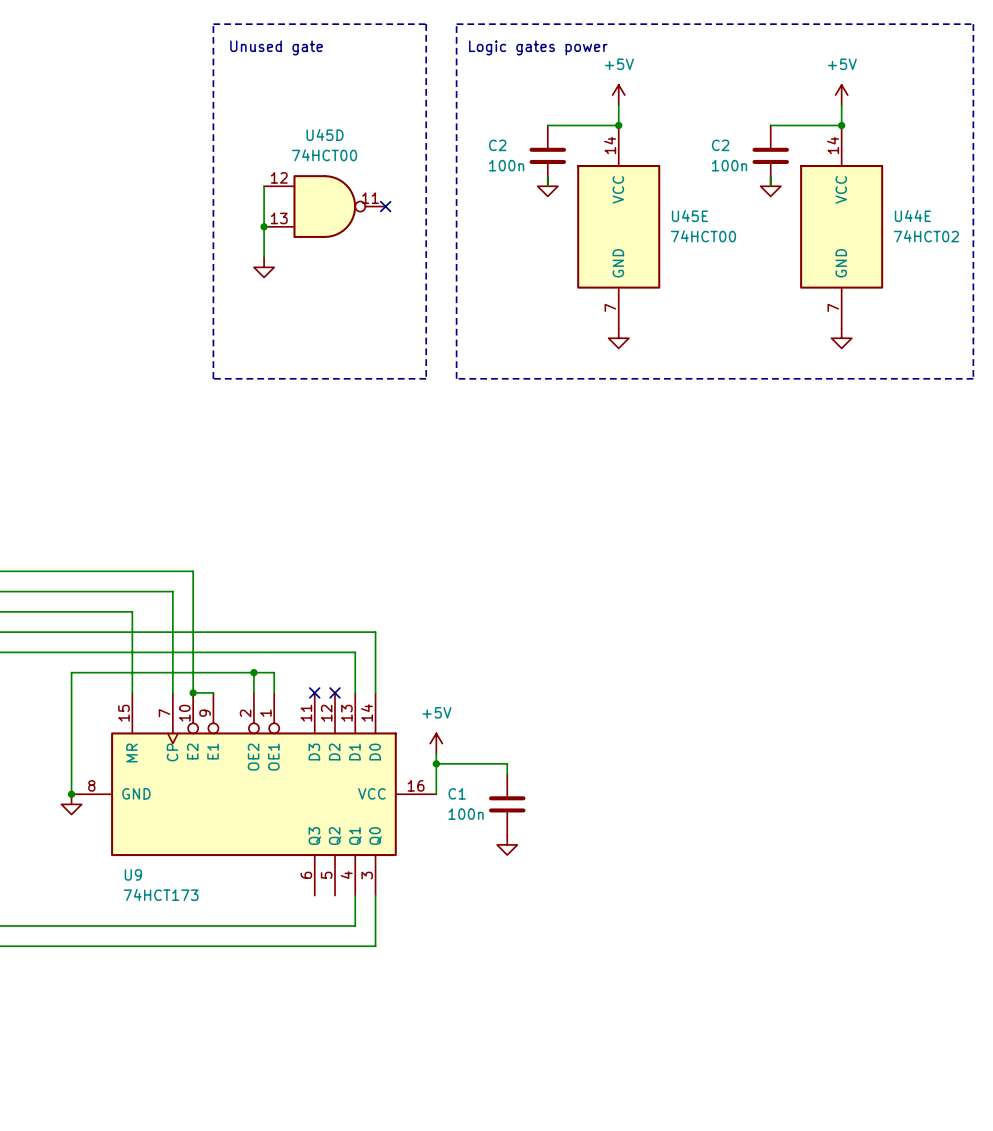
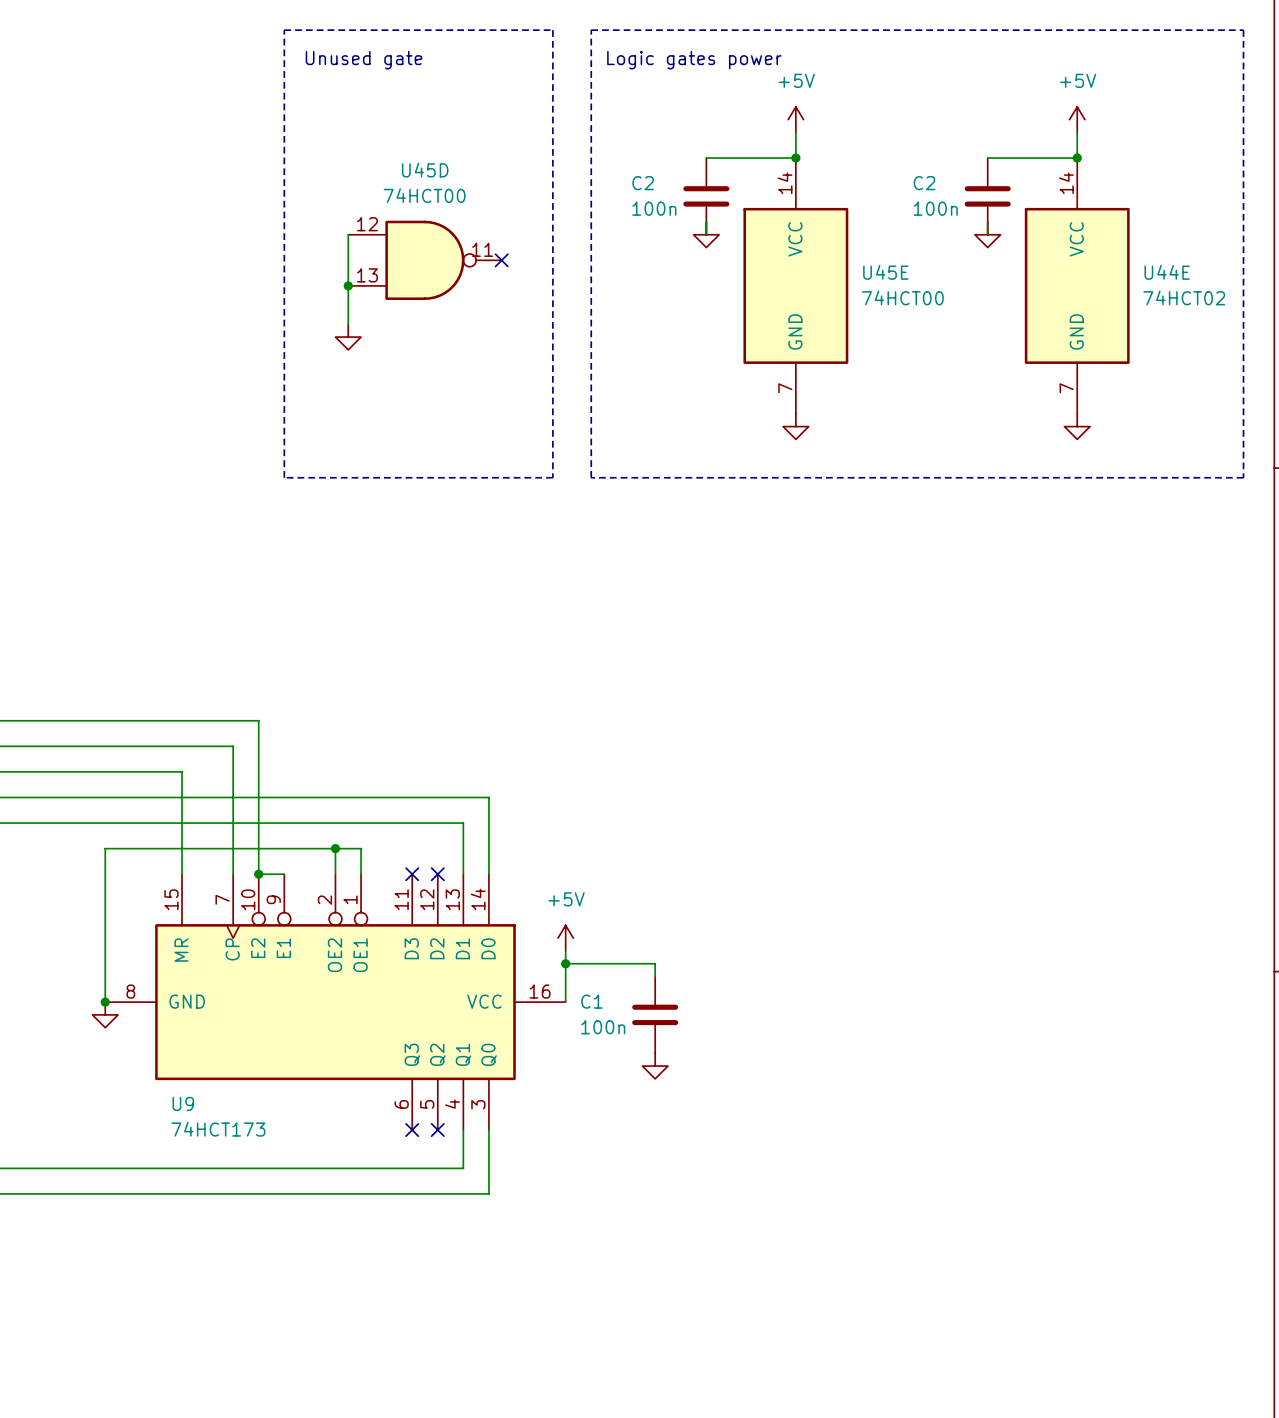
no-connect mark: none -> (412, 1130)
no-connect mark: none -> (437, 1130)

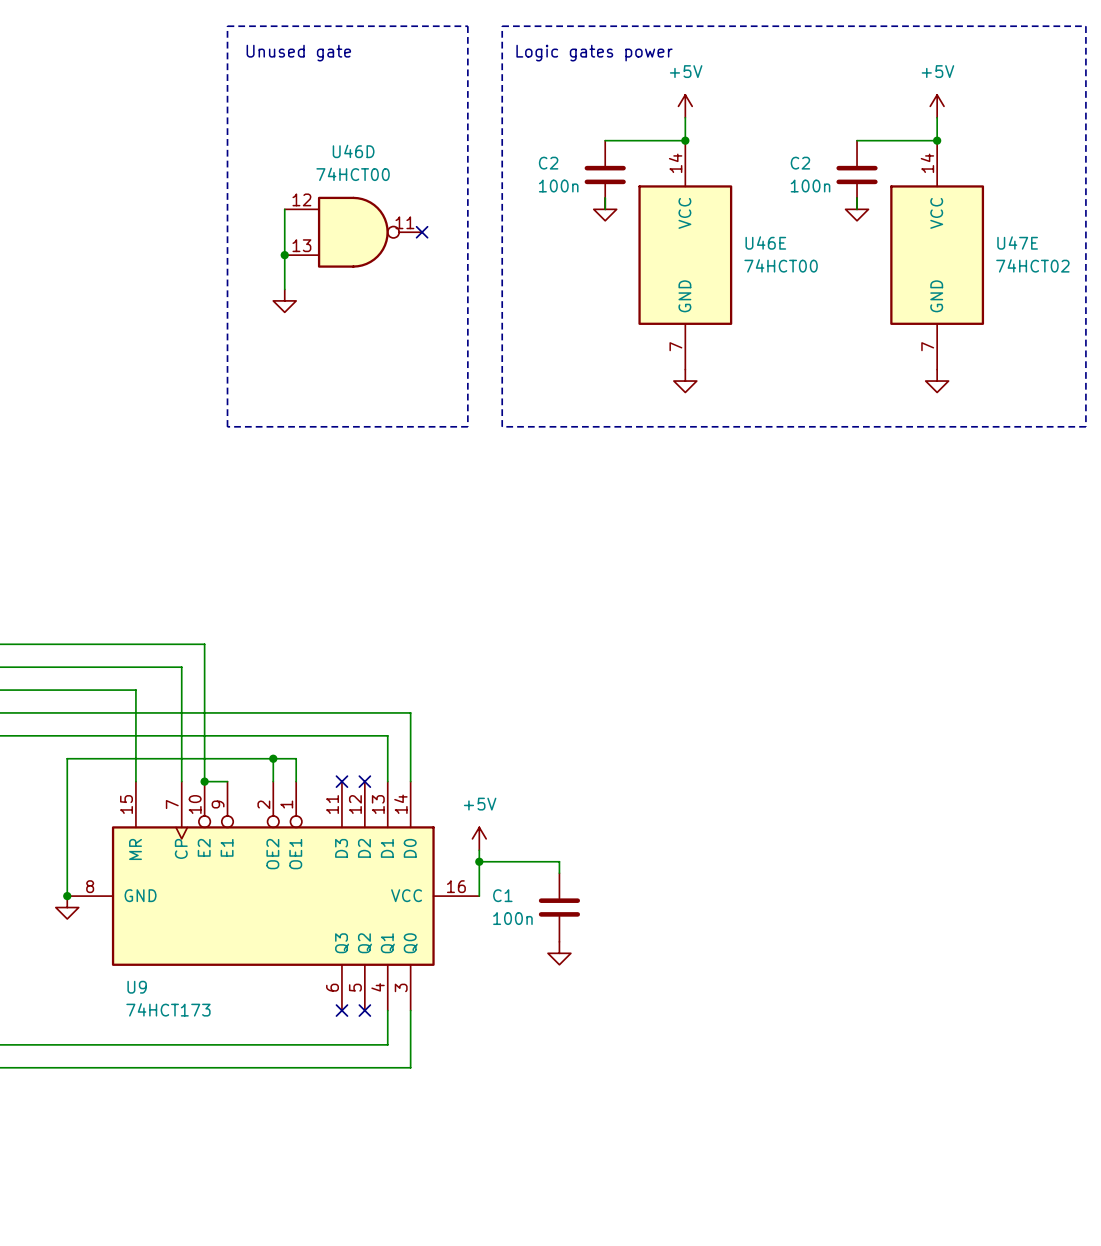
U45D name: U45D (425, 170) -> U46D (353, 151)
U45E name: U45E (885, 272) -> U46E (765, 242)
U44E name: U44E (1167, 272) -> U47E (1017, 242)

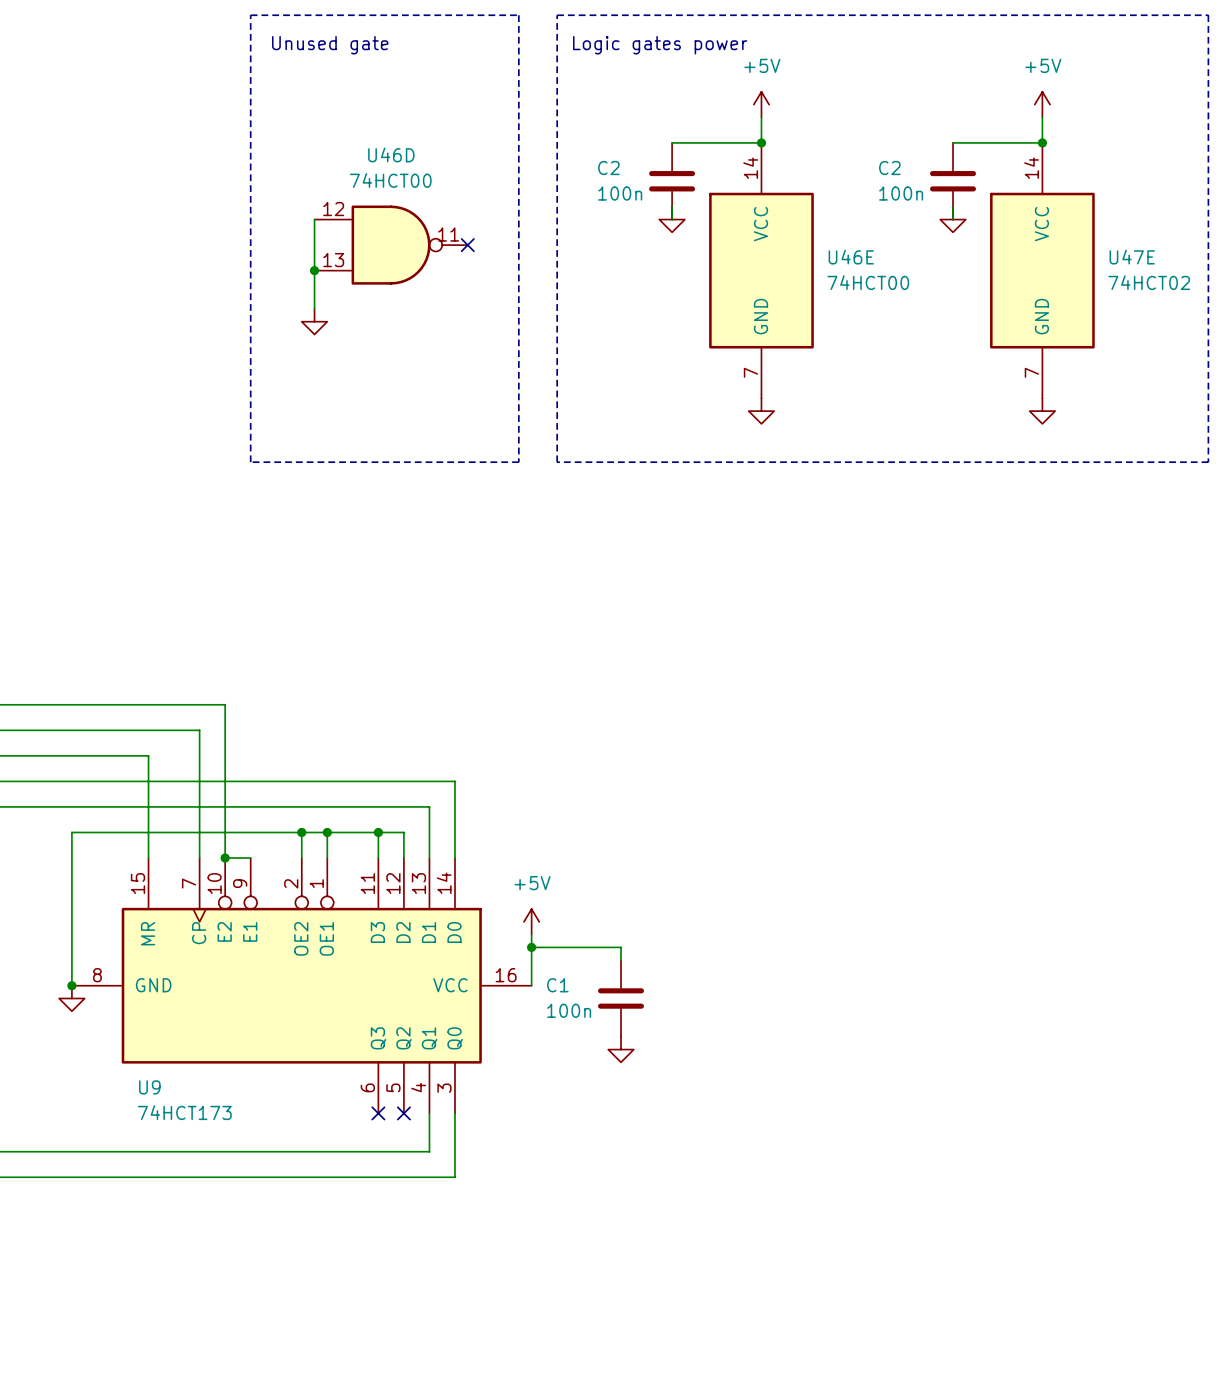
wire: none -> (327, 832) (403, 832) (403, 858)
junction: none -> (327, 832)
wire: none -> (378, 832) (378, 858)
junction: none -> (378, 832)
no-connect mark: (341, 781) -> none
no-connect mark: (364, 781) -> none

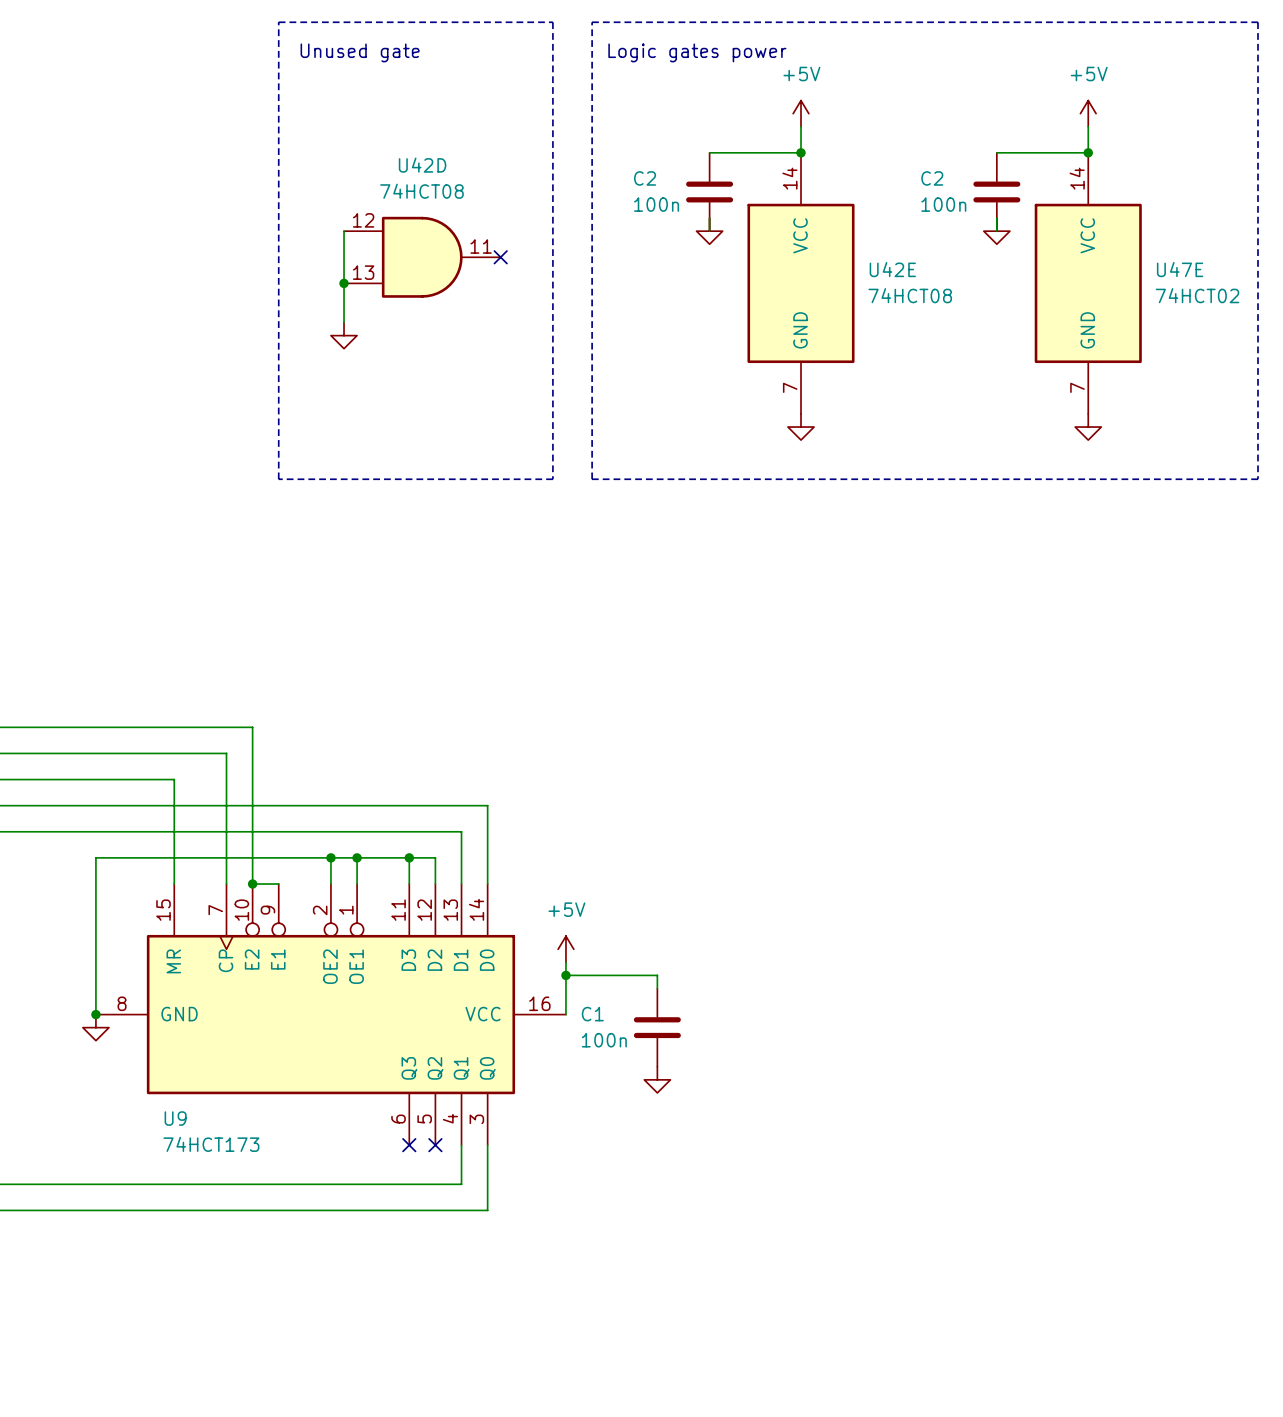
U46D: 74HCT00 (391, 245) -> none
U42D: none -> 74HCT08 (422, 257)
U46E name: U46E (851, 257) -> U42E (892, 269)
U46E value: 74HCT00 (868, 282) -> 74HCT08 (910, 295)

